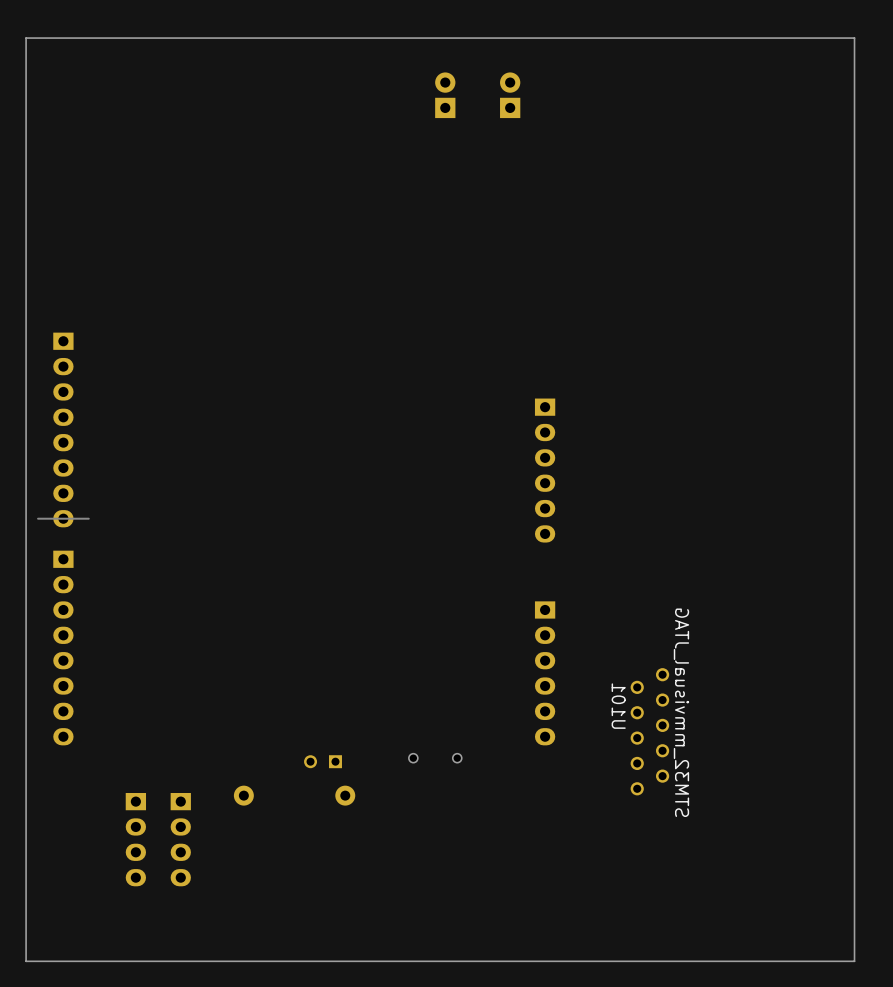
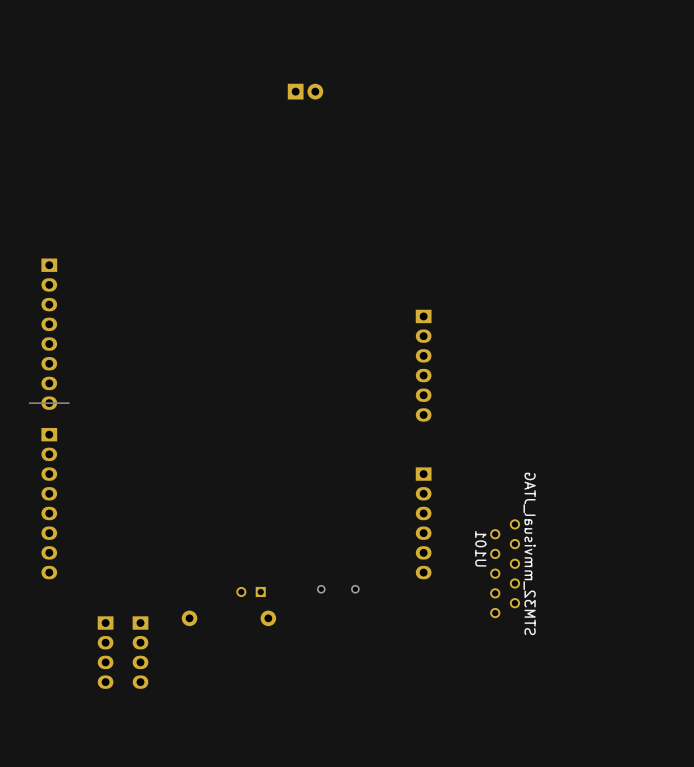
board edge: (854, 38) (854, 961) (26, 961) (26, 38) (854, 38) -> none
part rotation: 0° (445, 95) -> 90° clockwise (305, 91)
part position: (445, 95) -> (305, 91)
part: (510, 95) -> none

